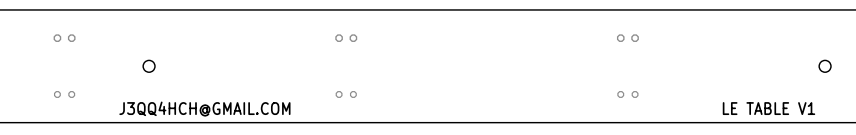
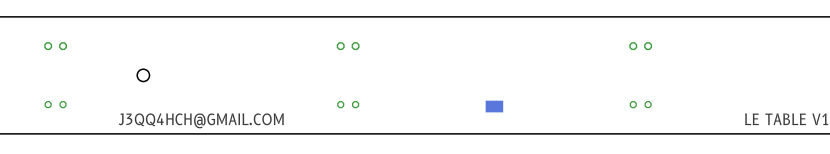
part: none -> (488, 106)
part: none -> (494, 106)
part: none -> (500, 106)

